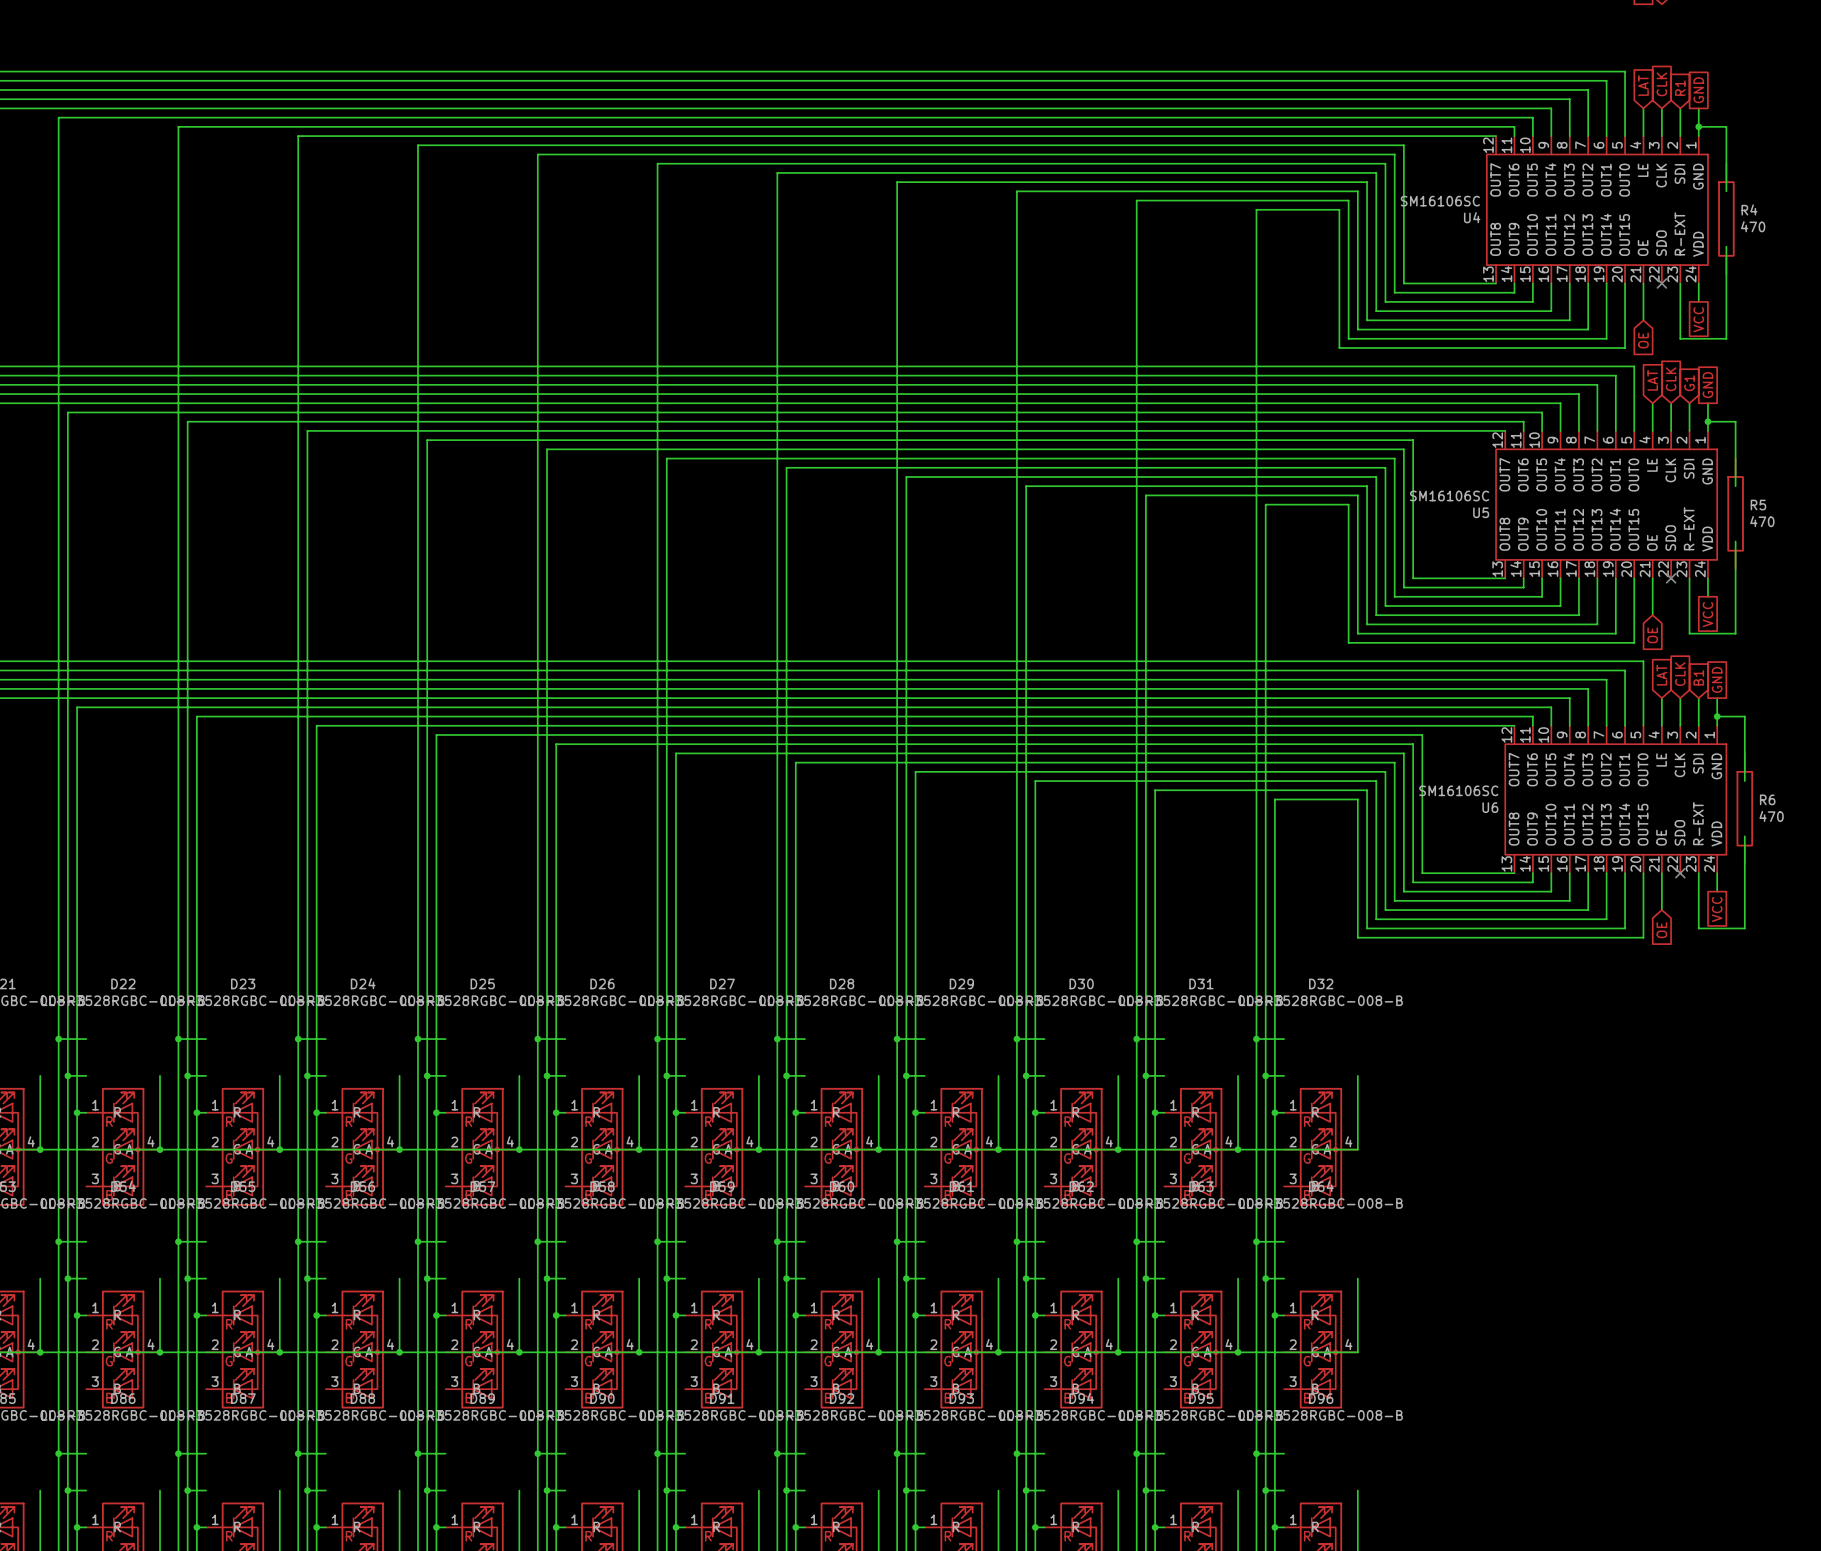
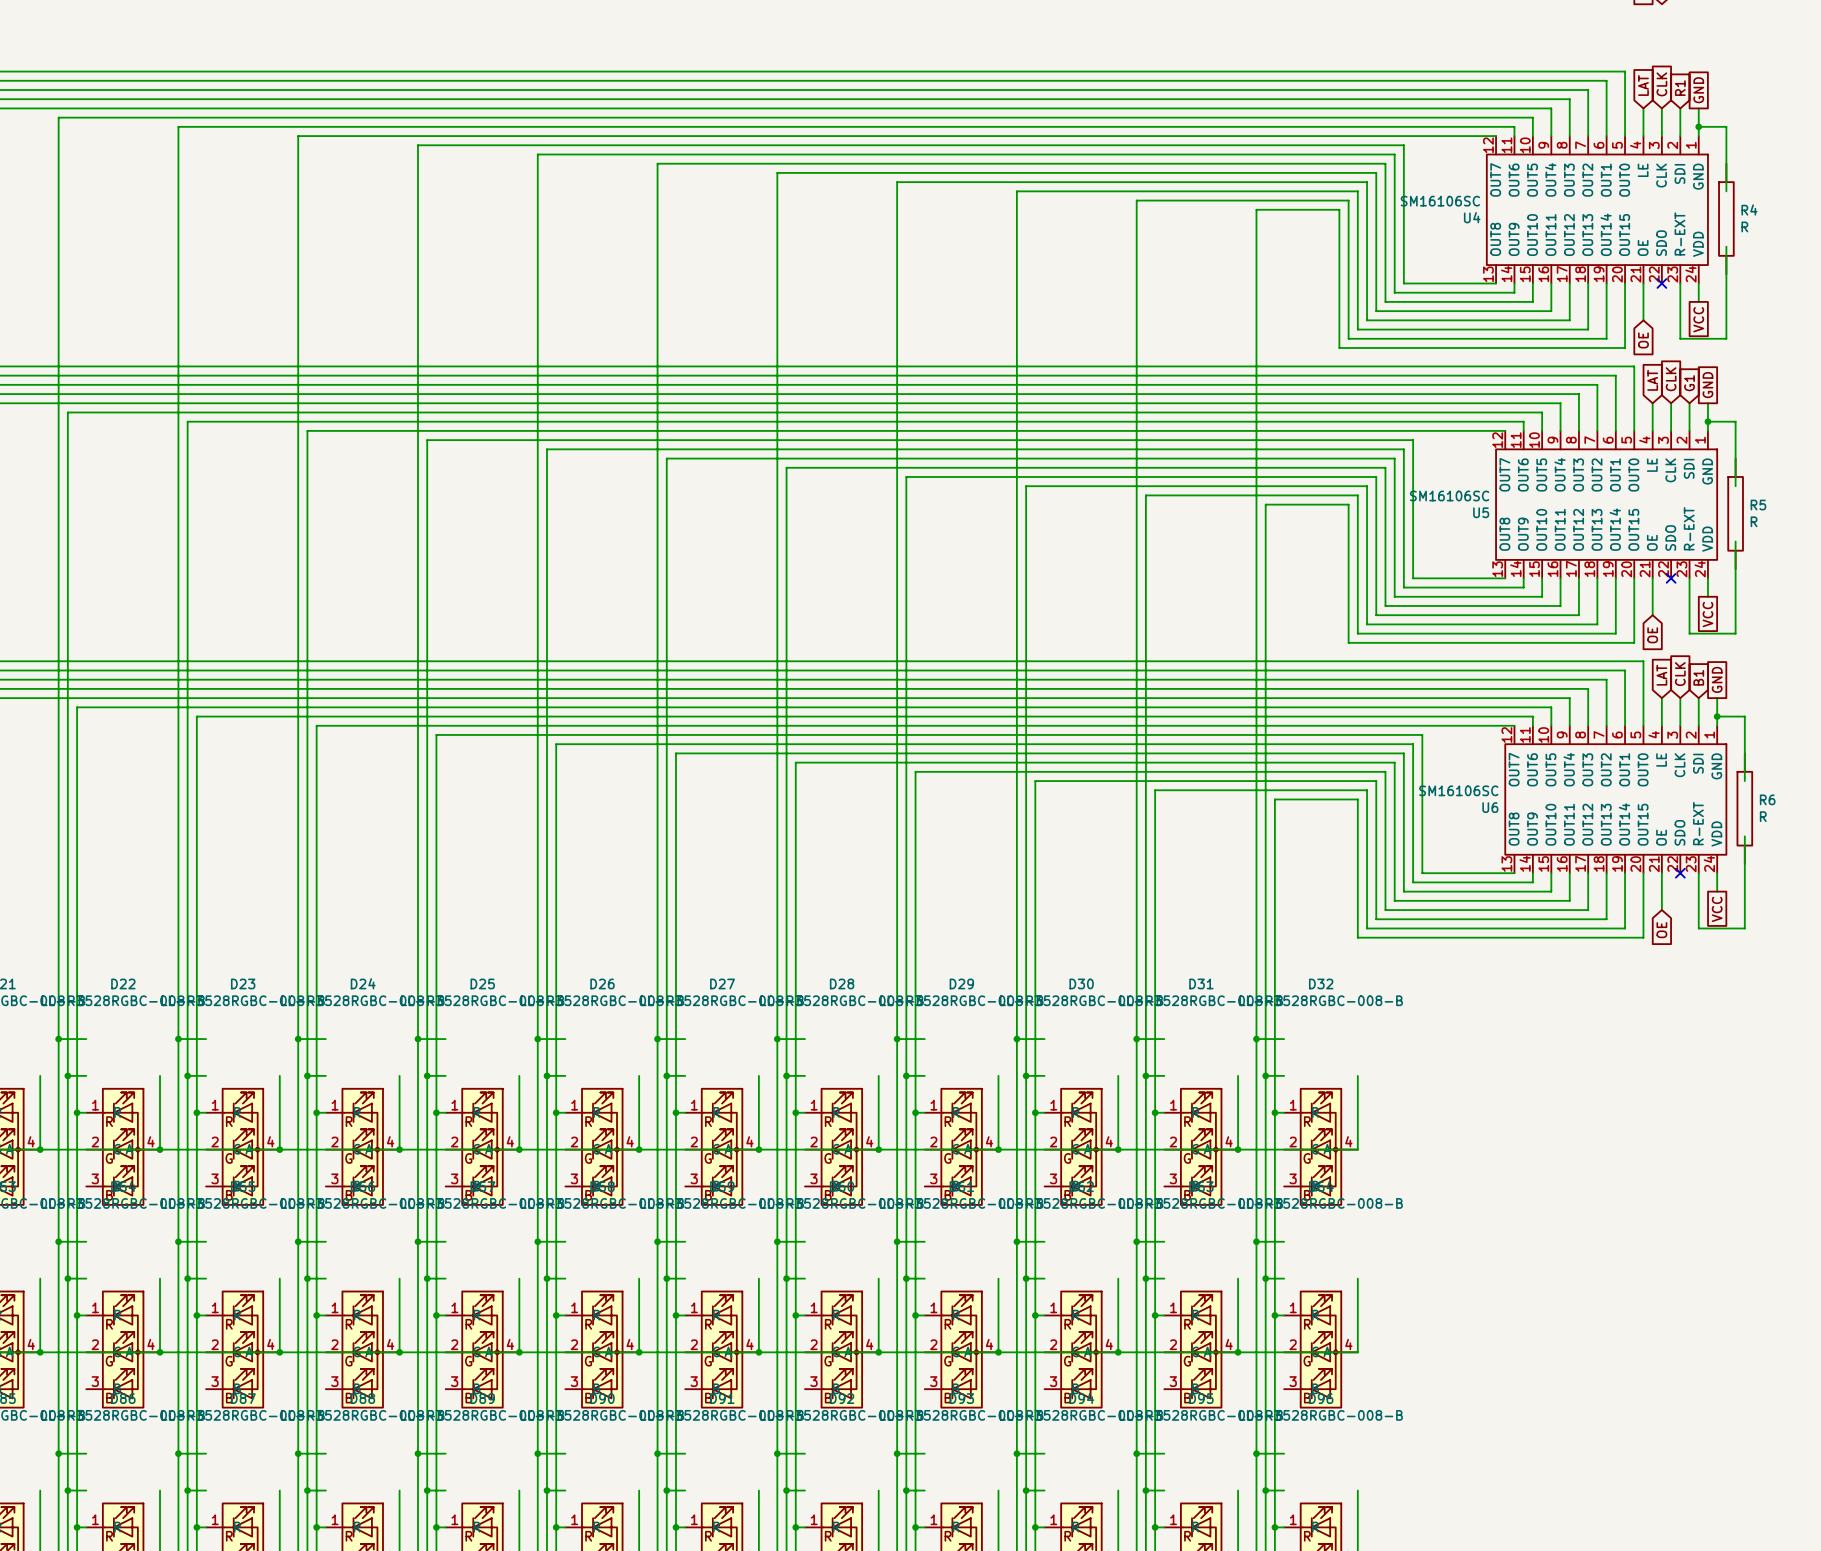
R4 value: 470 (1753, 226) -> R (1744, 226)
R5 value: 470 (1762, 521) -> R (1754, 521)
R6 value: 470 (1771, 816) -> R (1763, 816)

